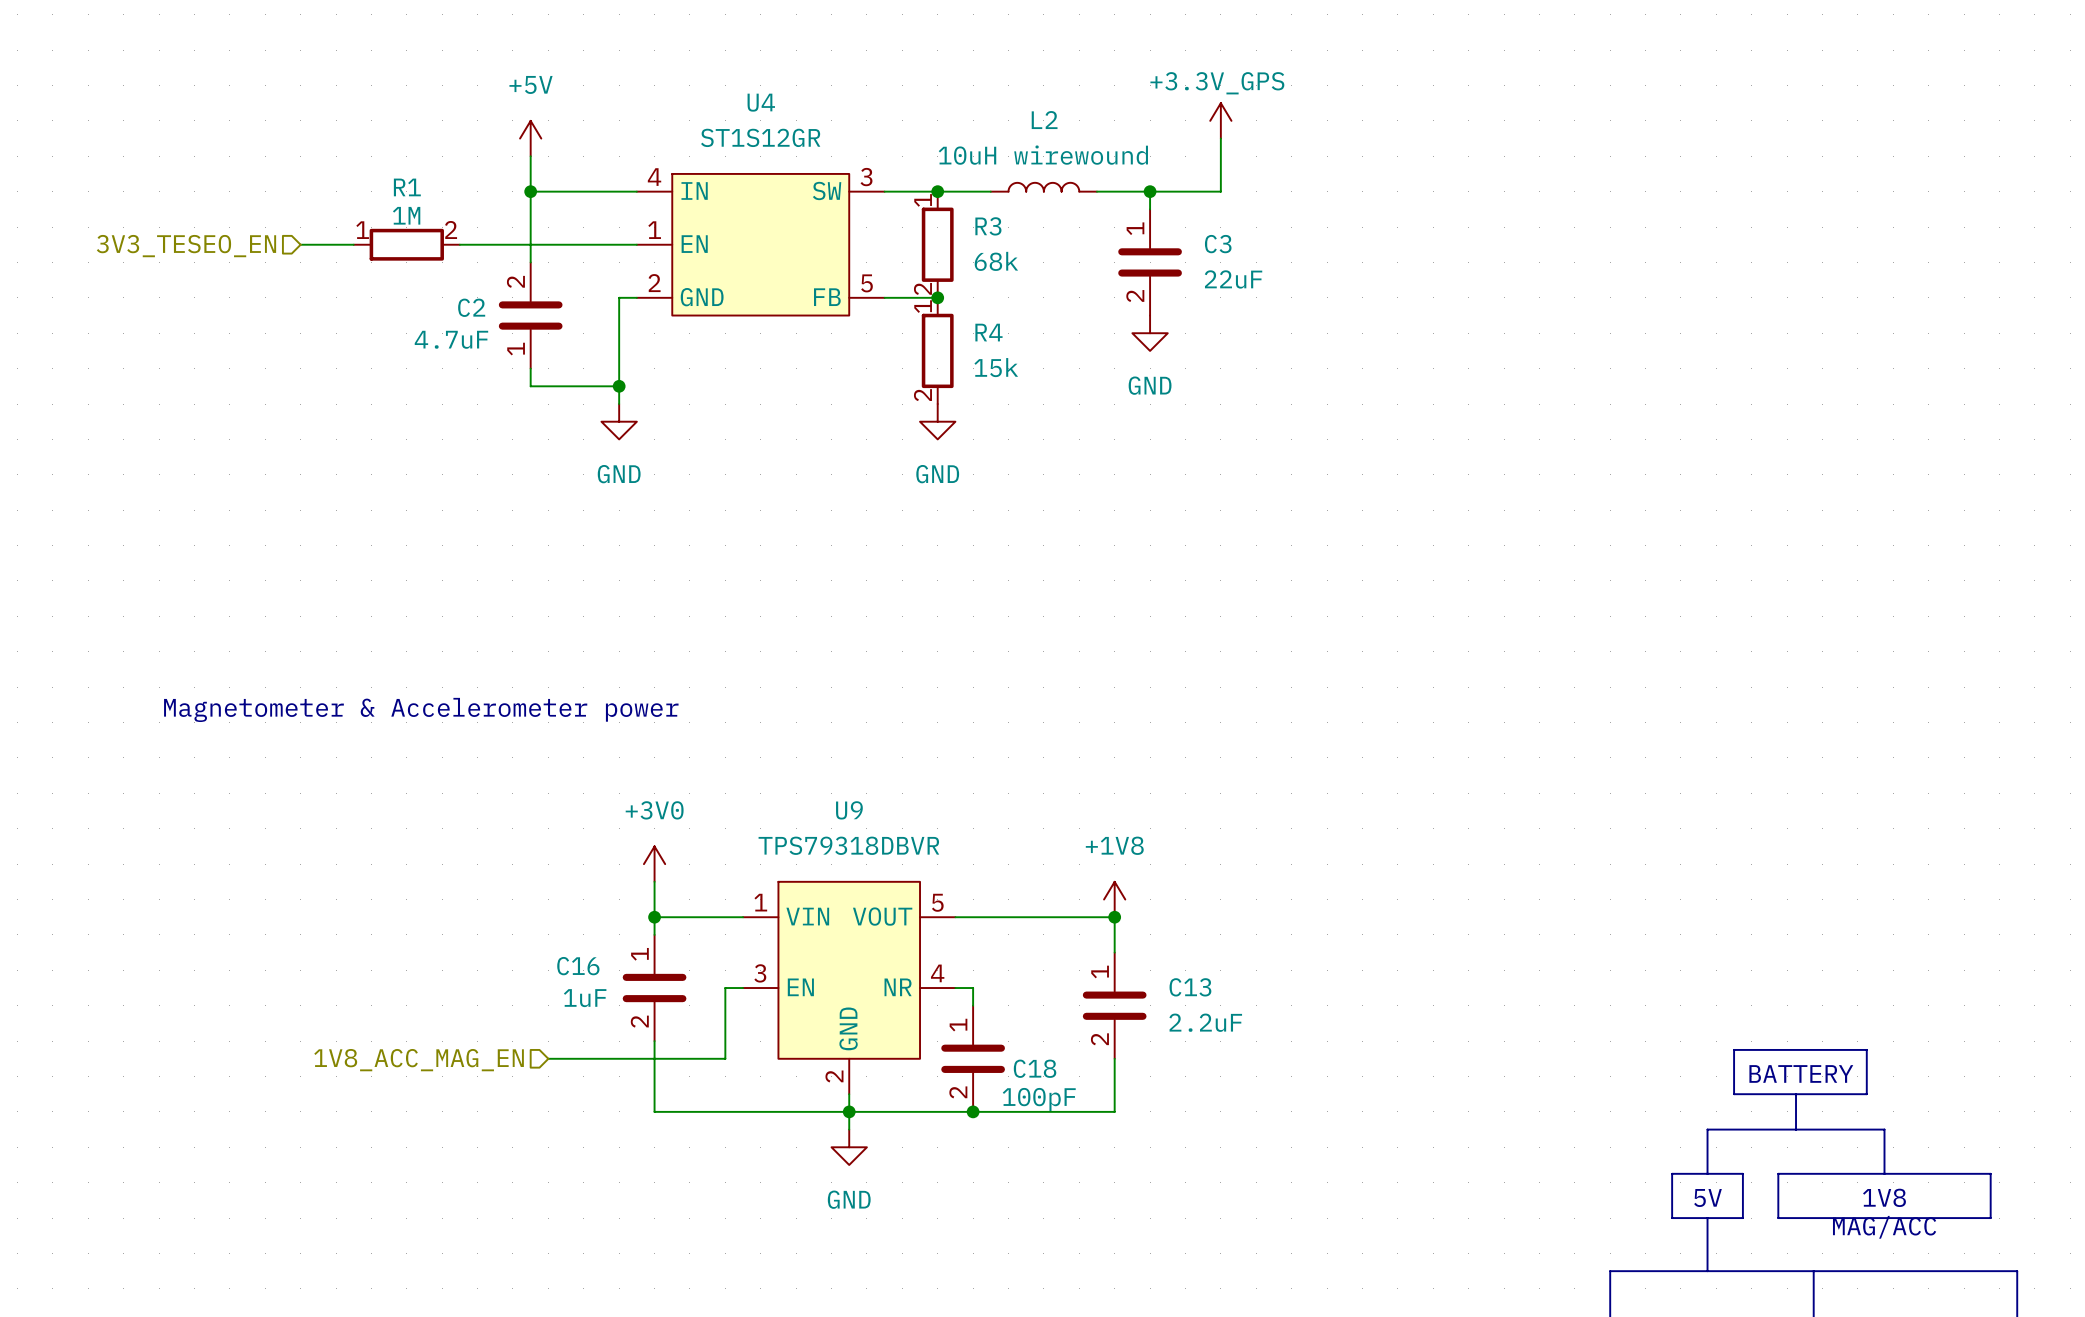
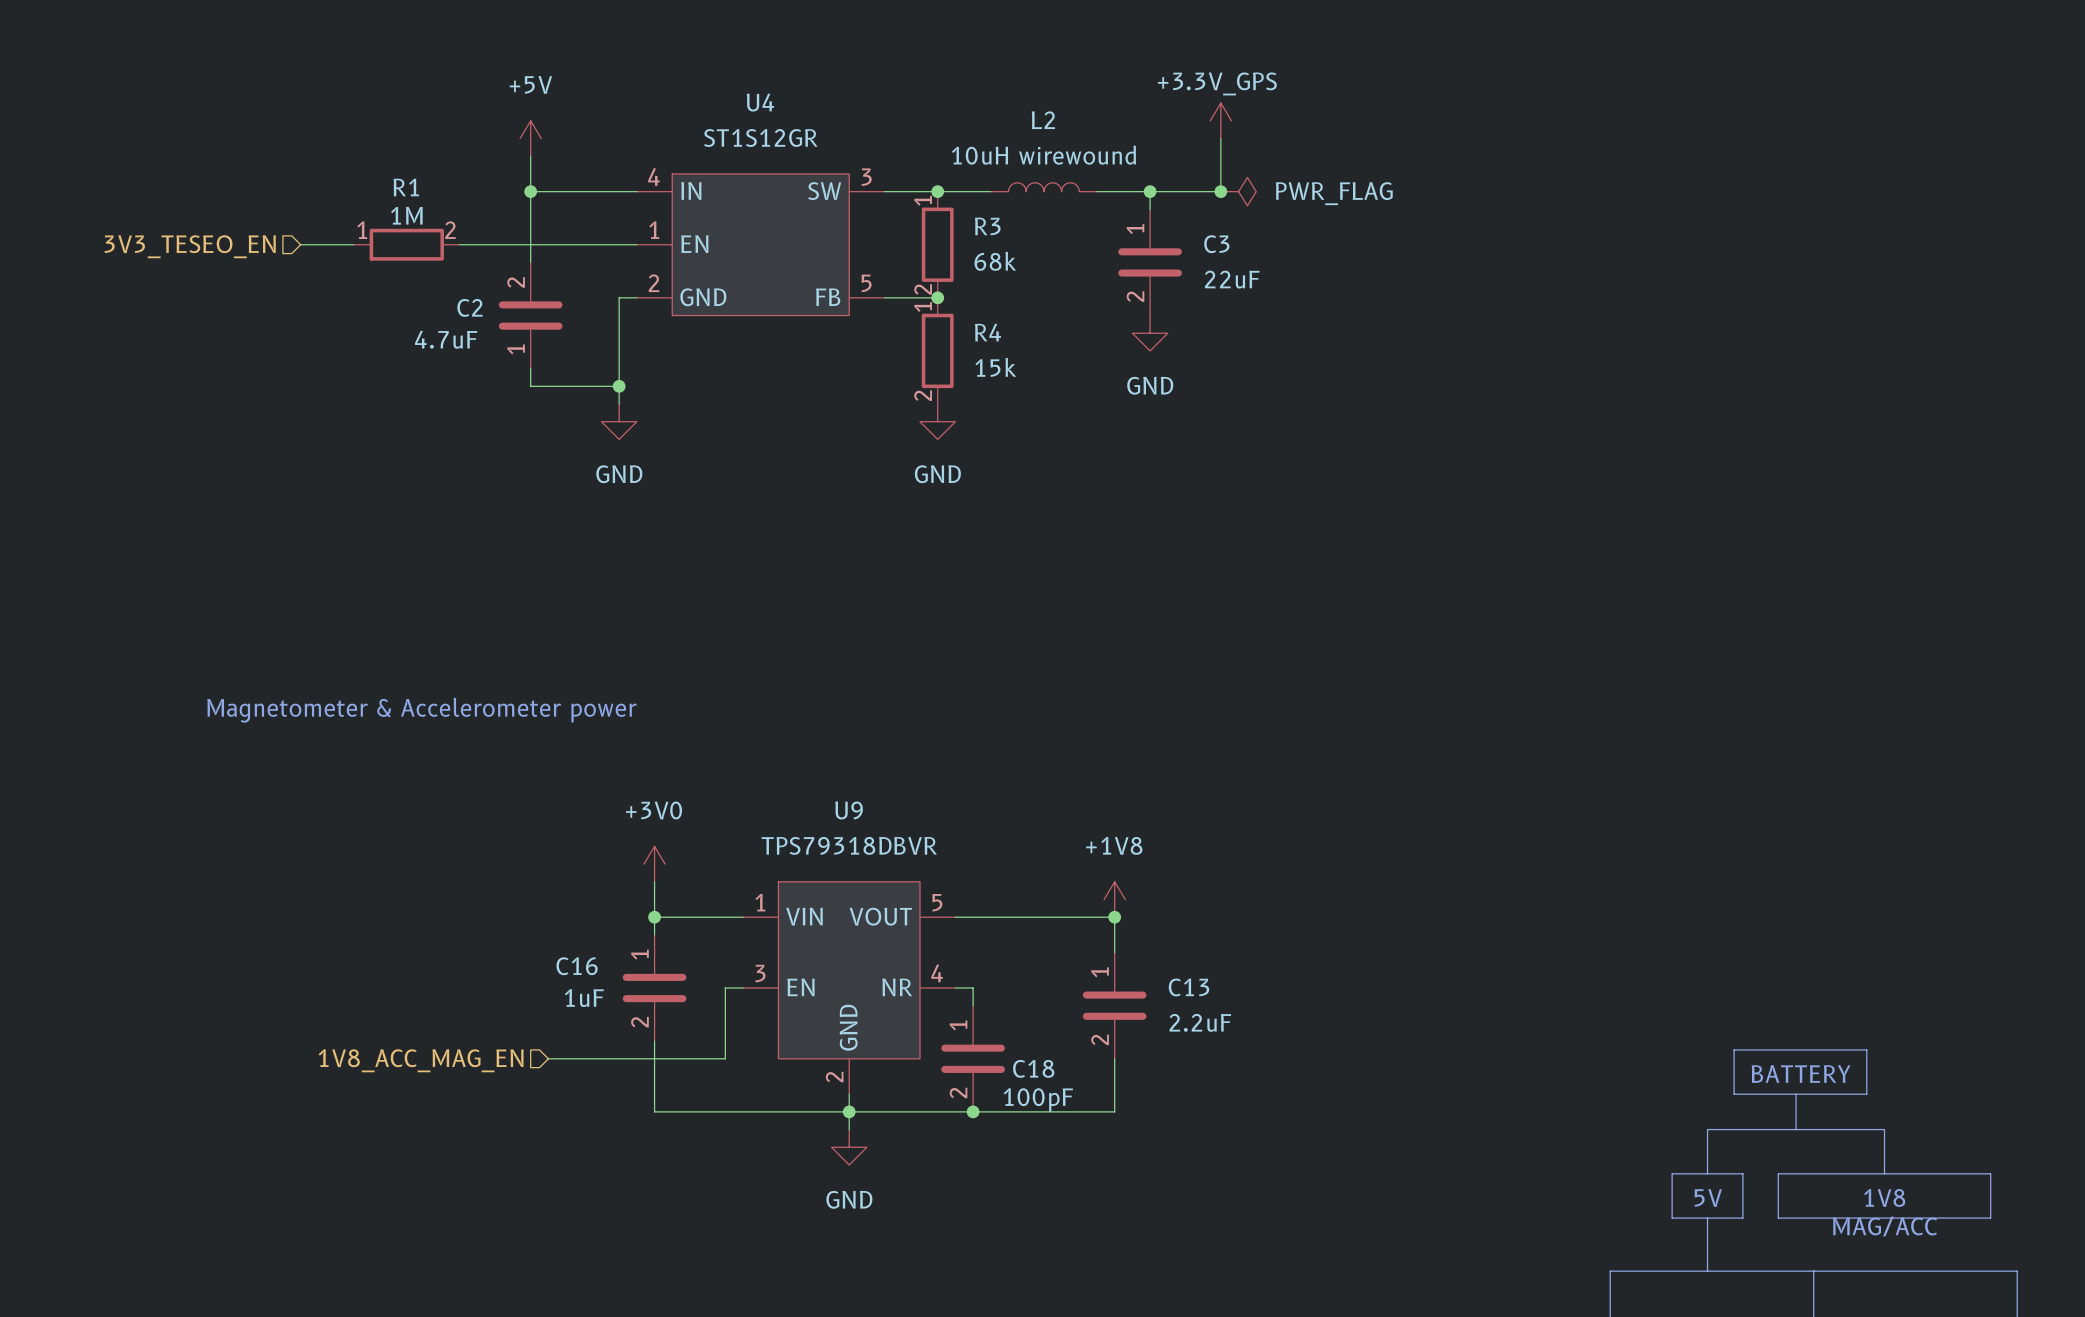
junction: none -> (1220, 191)
power symbol: none -> PWR_FLAG (1238, 191)

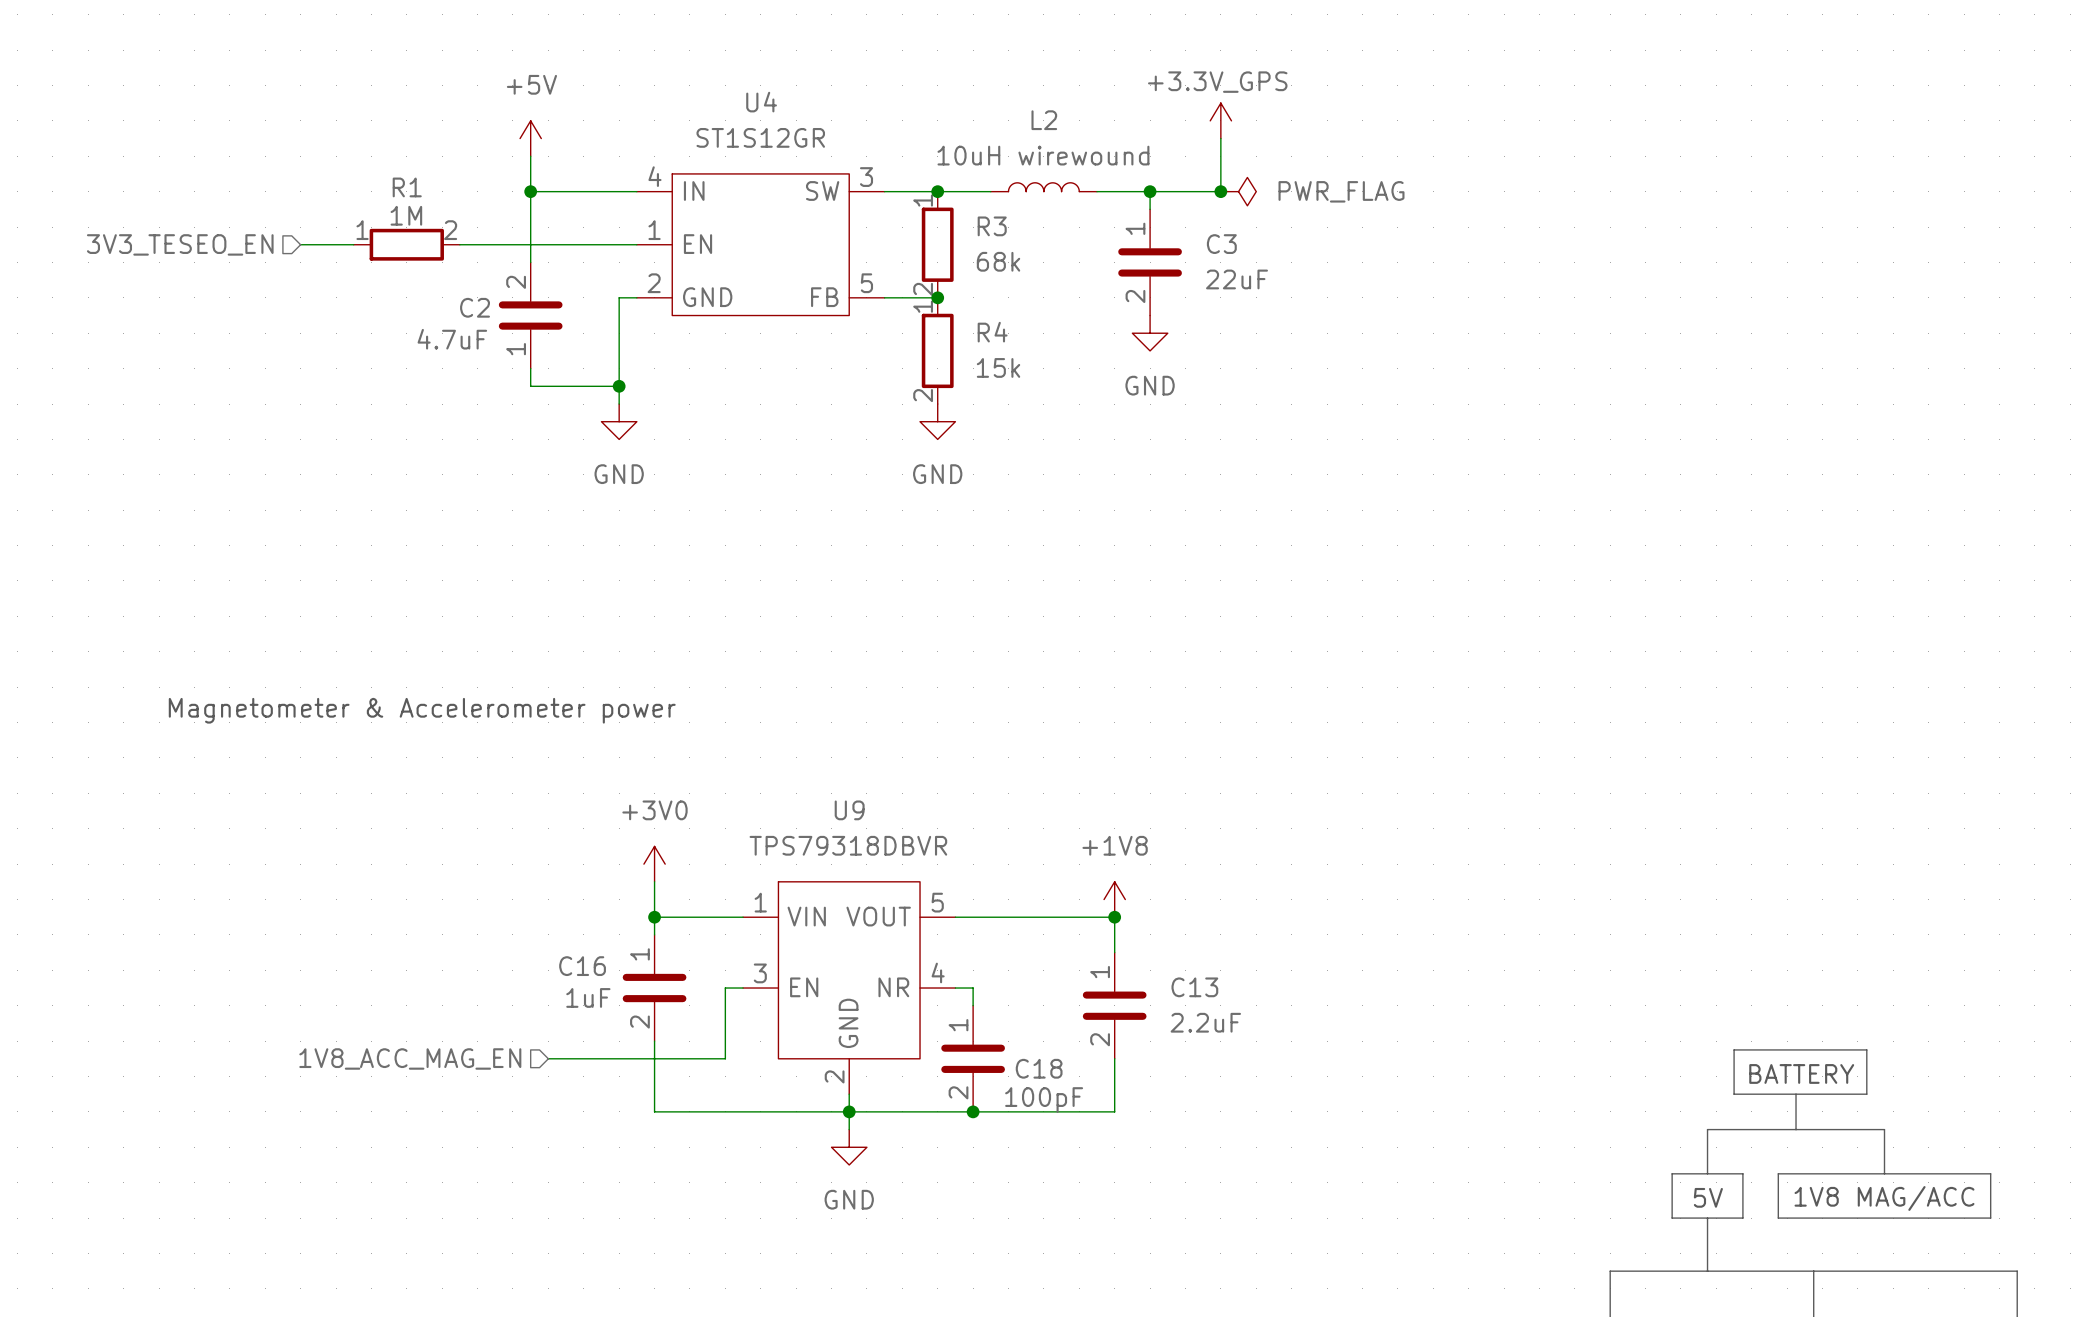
text: 1V8 (1884, 1197) -> 1V8 MAG/ACC (1884, 1198)
text: MAG/ACC (1885, 1226) -> none

